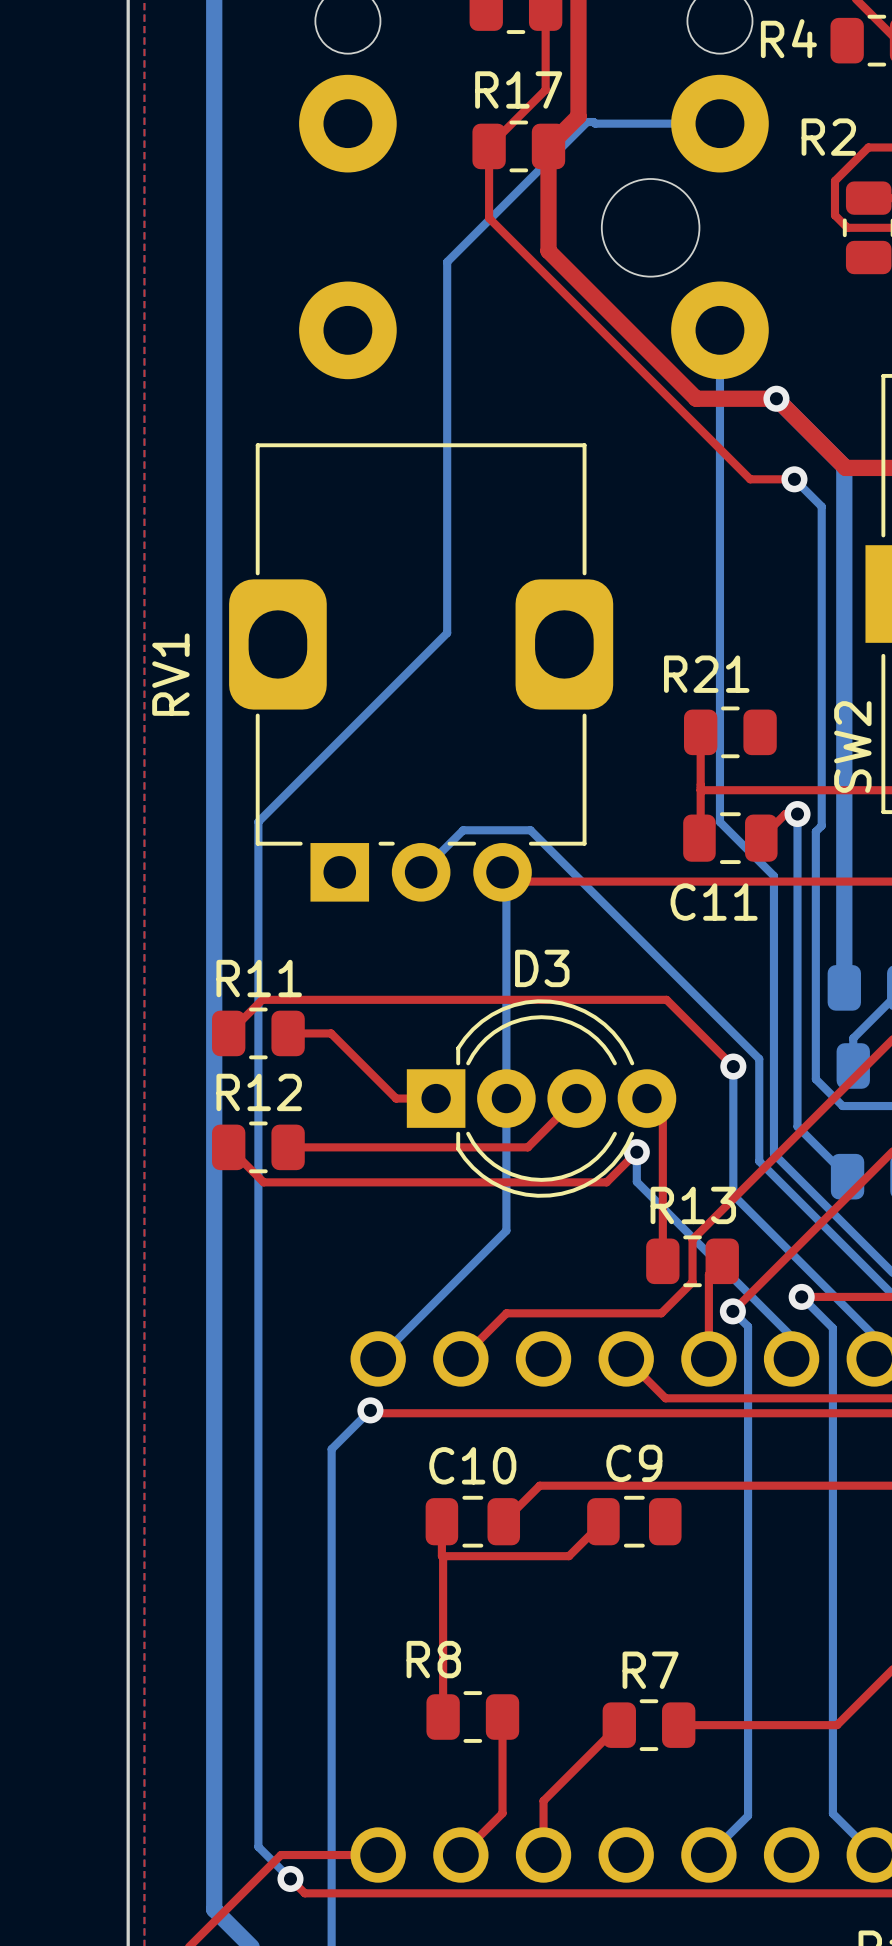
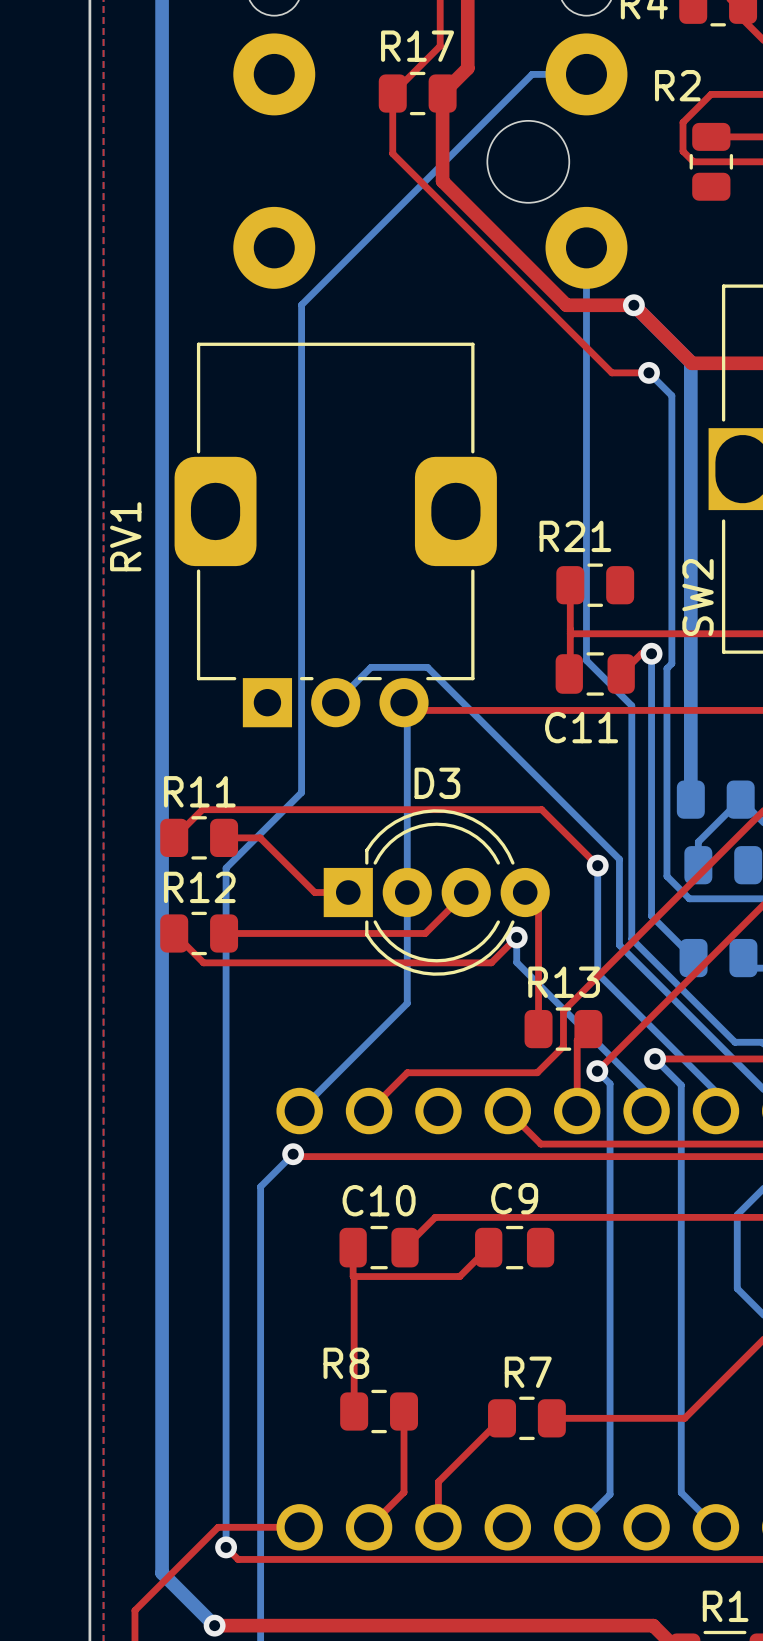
bottom track: (655, 123) (587, 122) (447, 261) (447, 633) (258, 821) (258, 1846) (290, 1878) -> (532, 74) (301, 304) (301, 792) (226, 868) (226, 1547)

